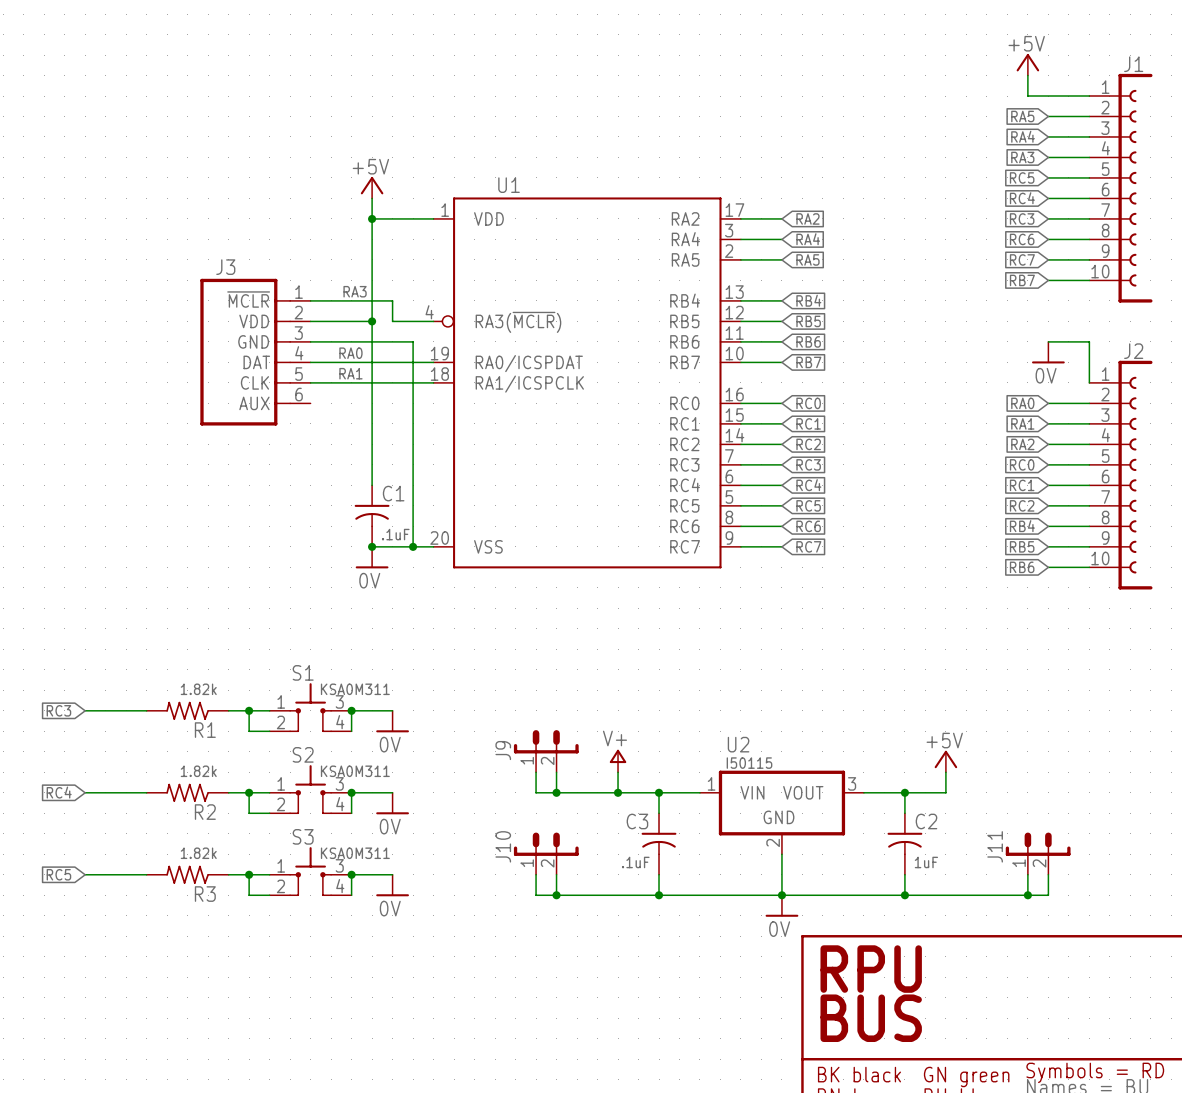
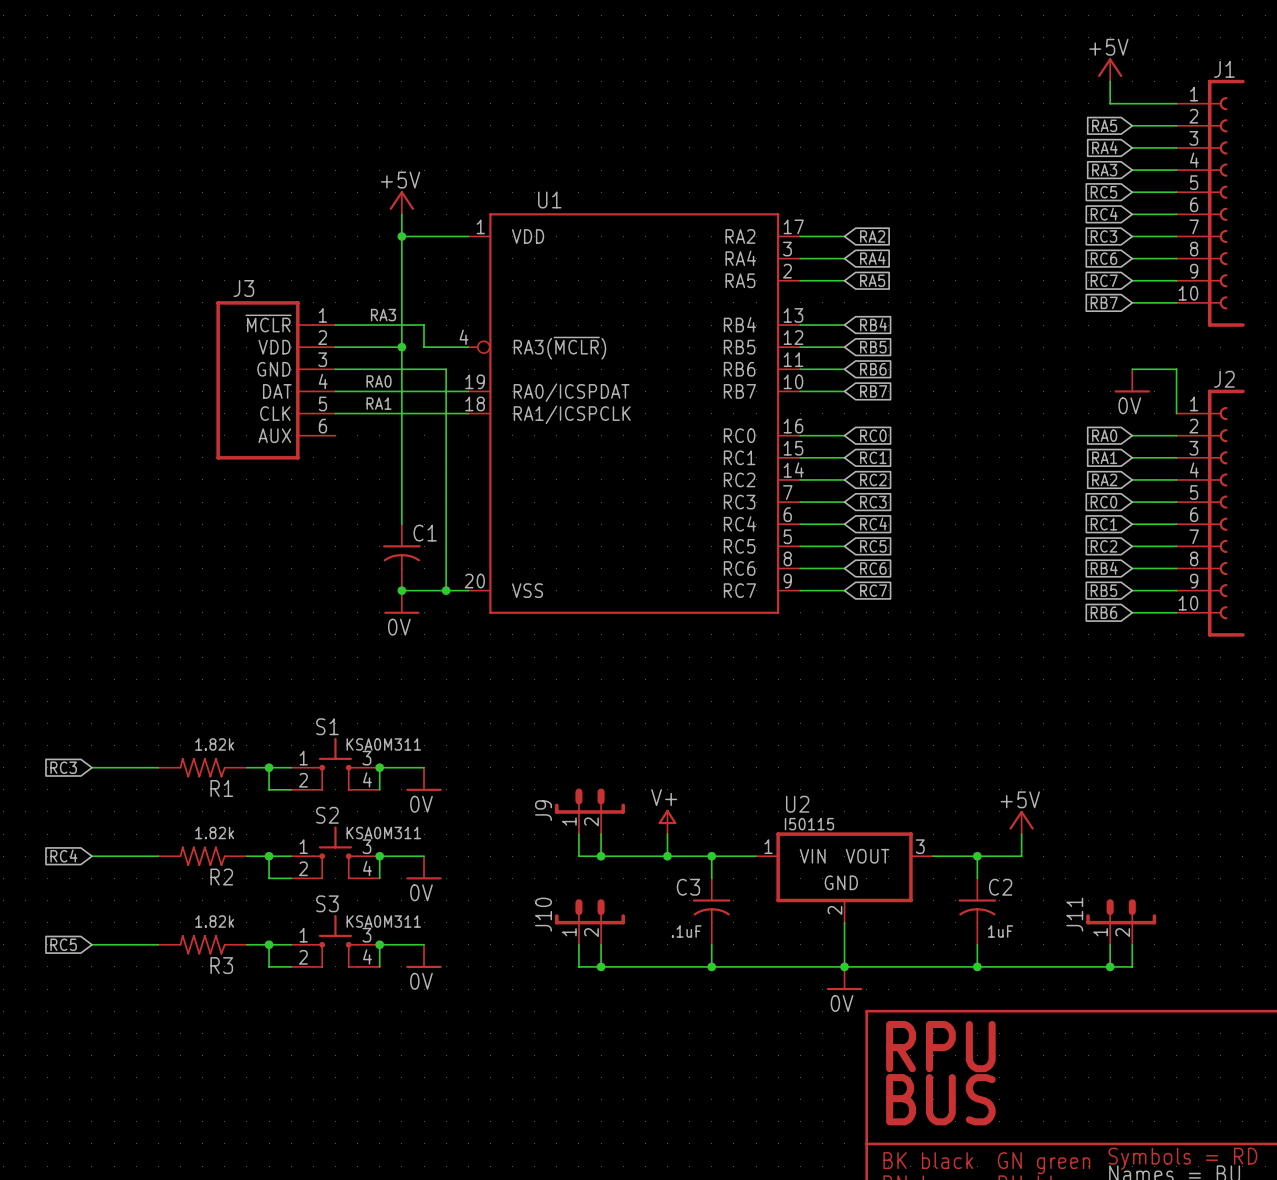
C1 value: .1uF (395, 534) -> none

